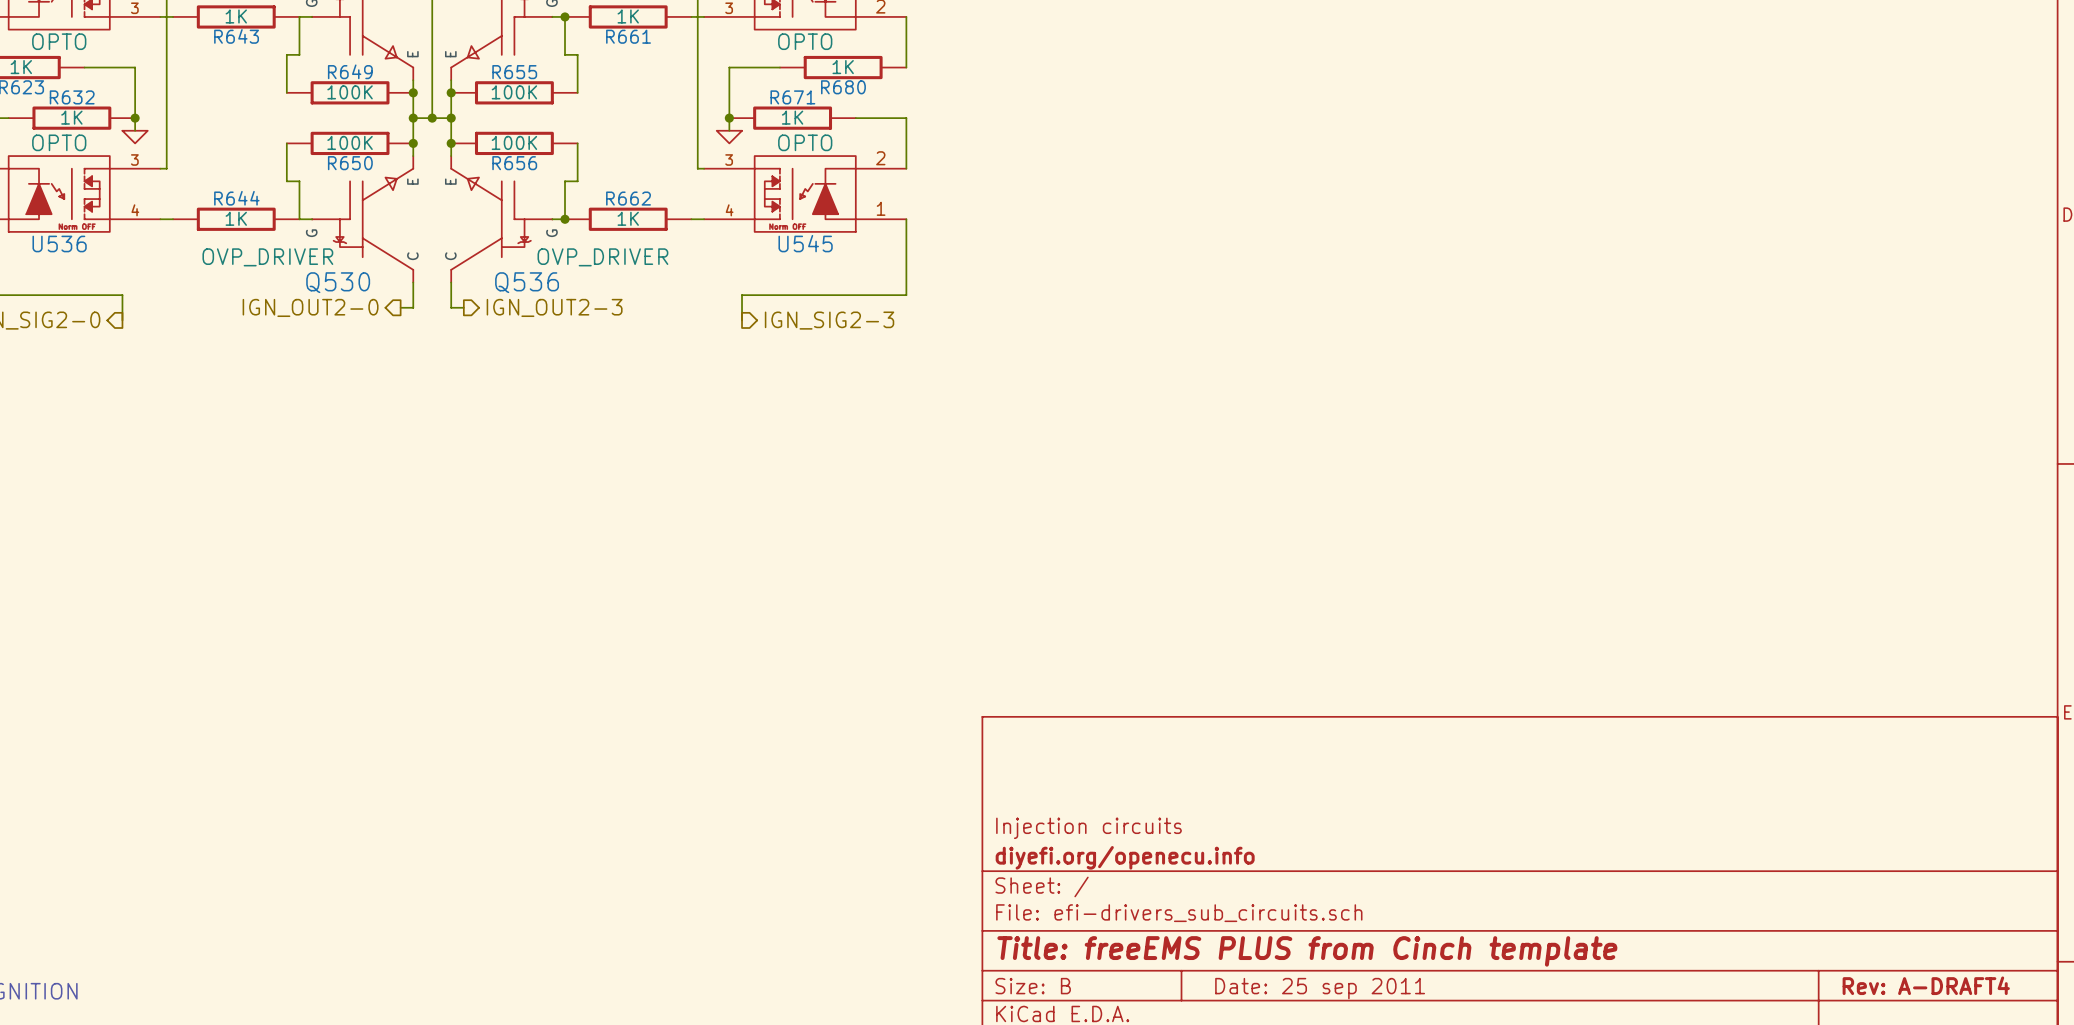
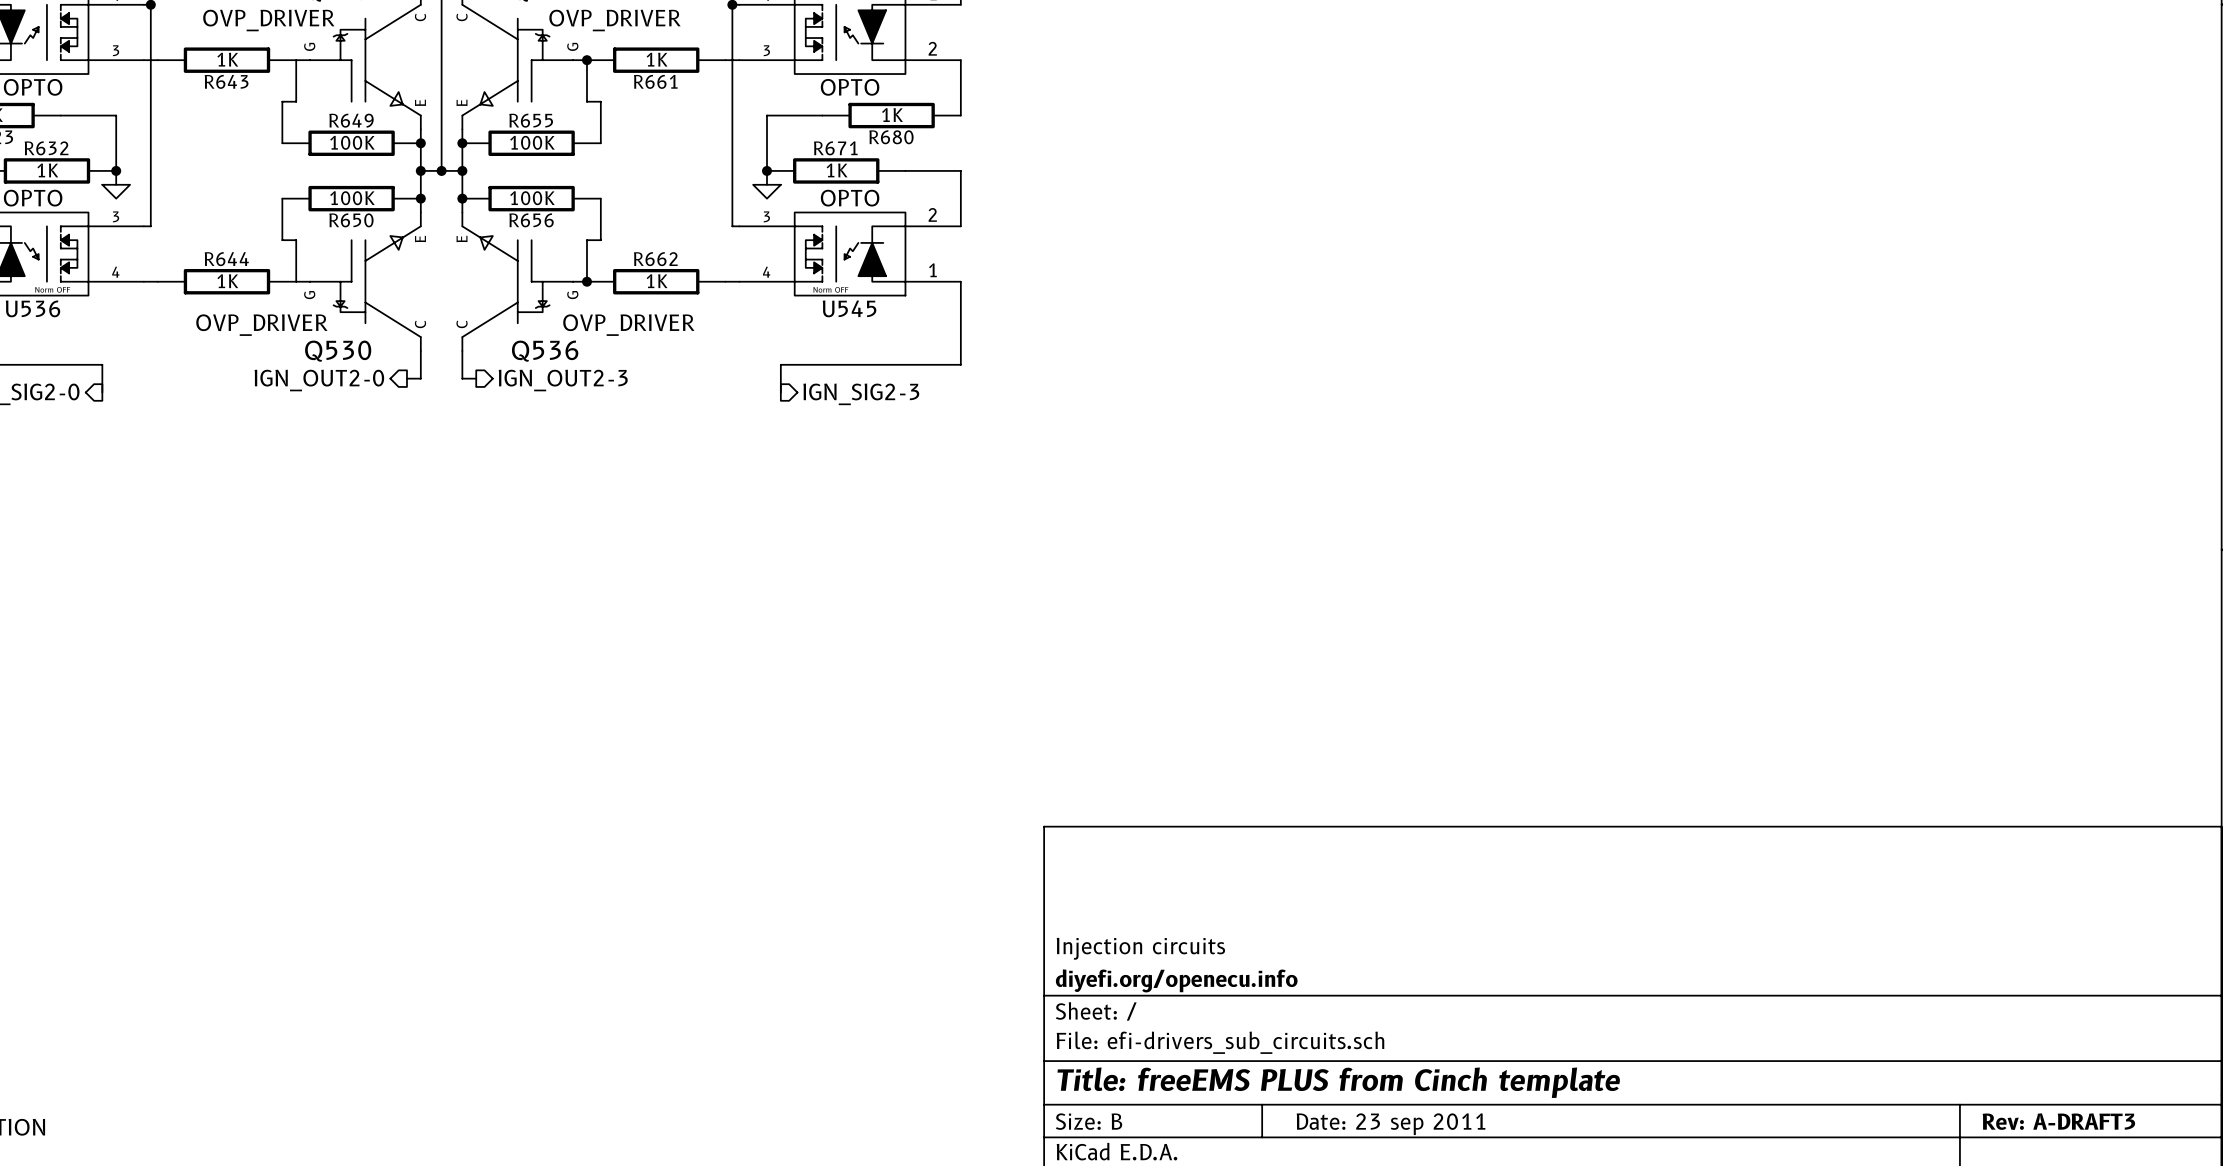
title block: Rev: A-DRAFT4 (1926, 985) -> Rev: A-DRAFT3 (2058, 1121)
title block: Date: 25 sep 2011 (1320, 988) -> Date: 23 sep 2011 (1391, 1124)

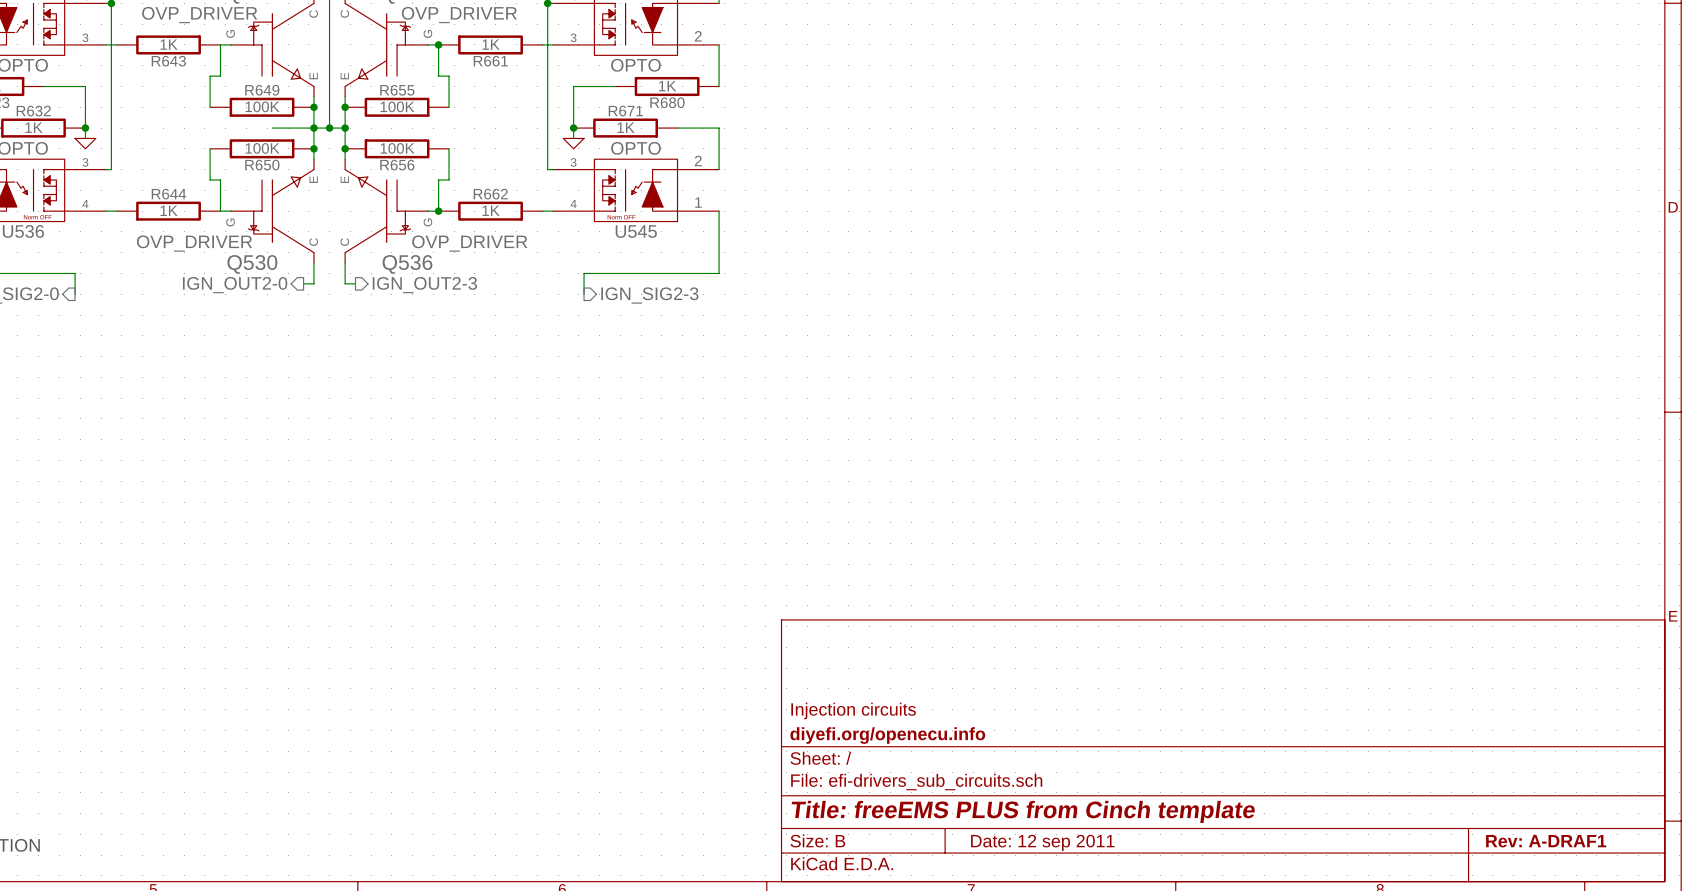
wire: none -> (272, 128) (313, 128)
title block: Rev: A-DRAFT3 (2058, 1121) -> Rev: A-DRAF1 (1546, 841)
title block: Date: 23 sep 2011 (1391, 1124) -> Date: 12 sep 2011 (1042, 842)

